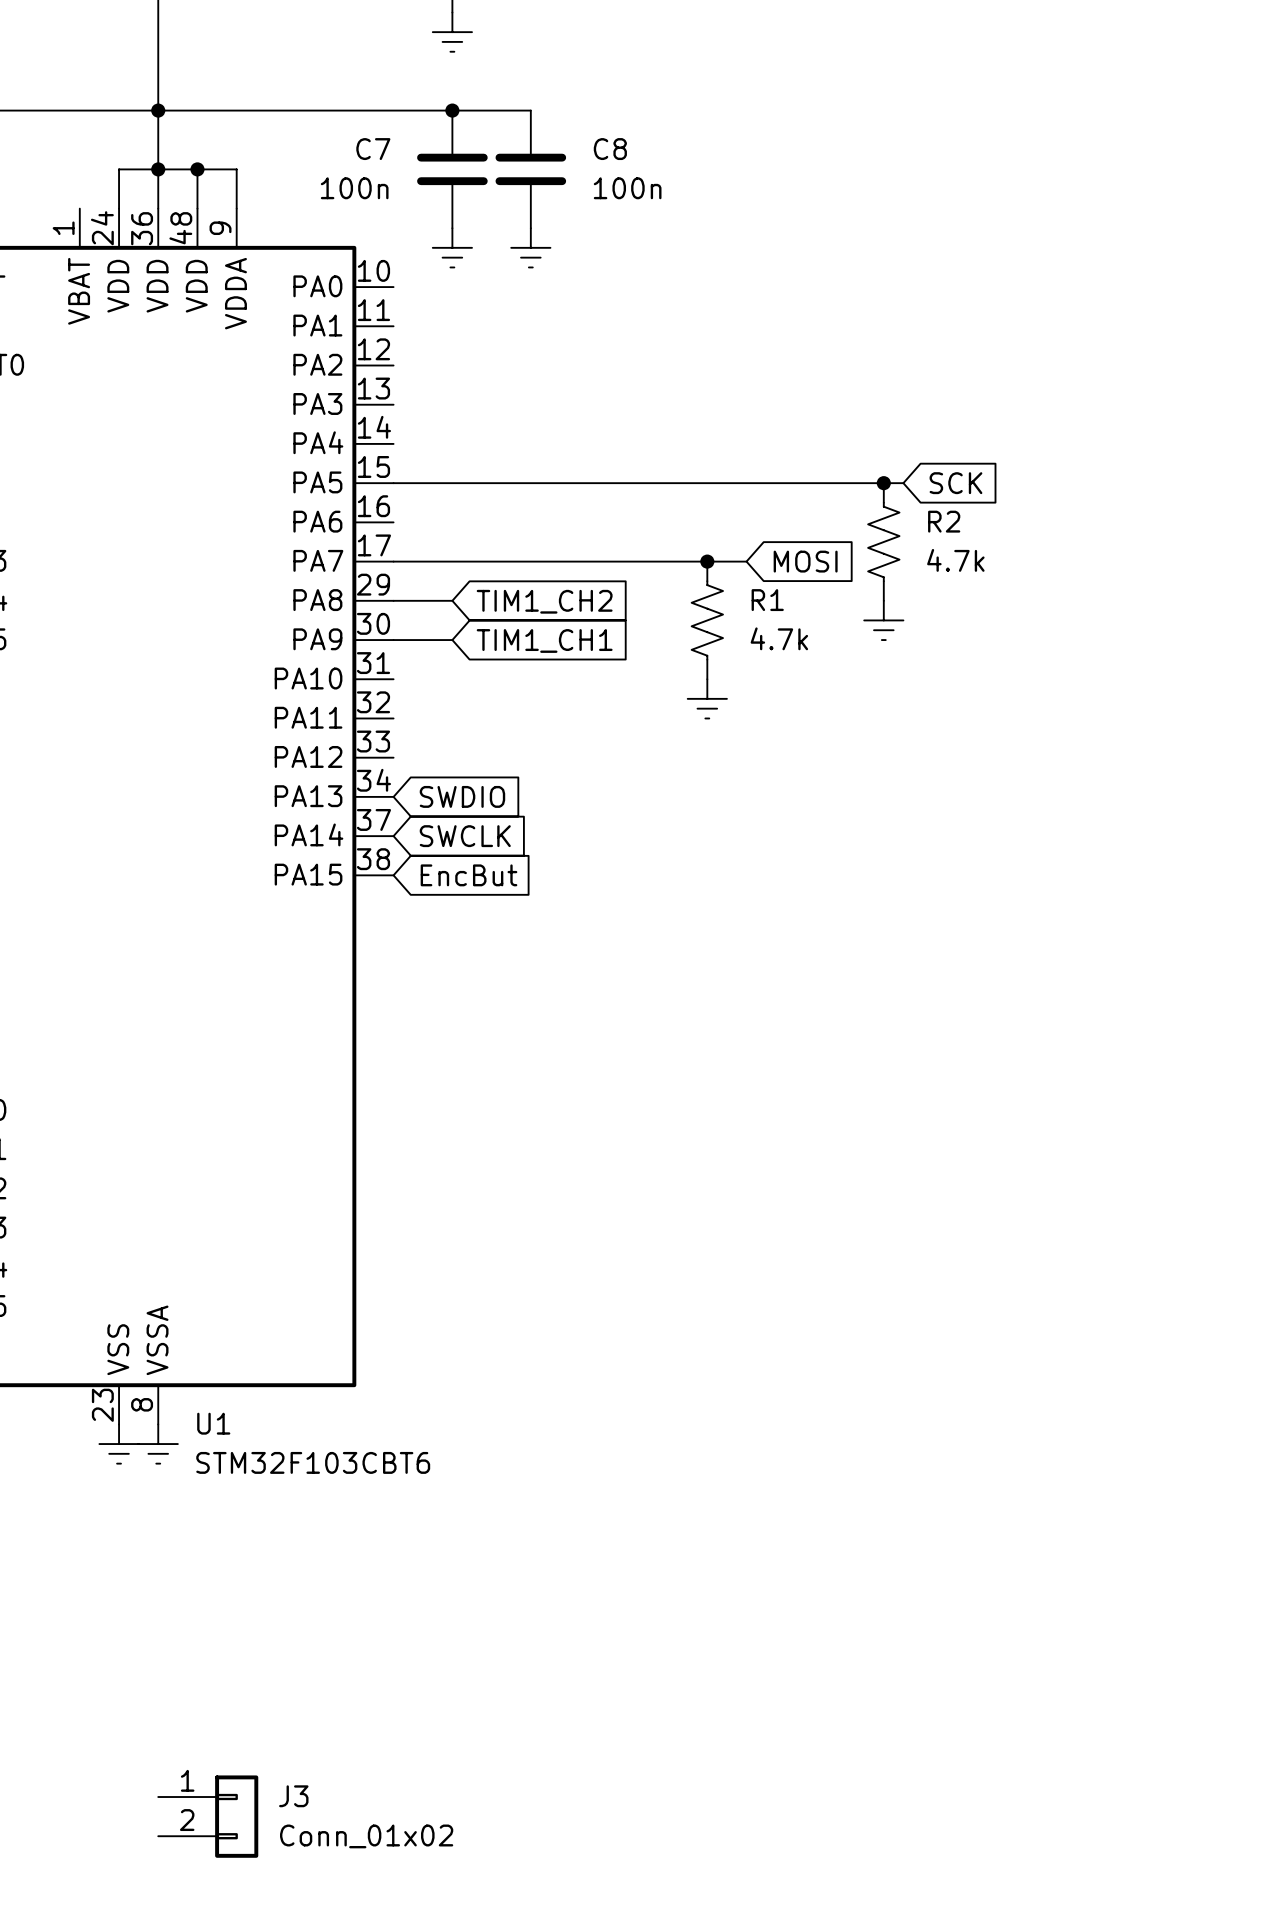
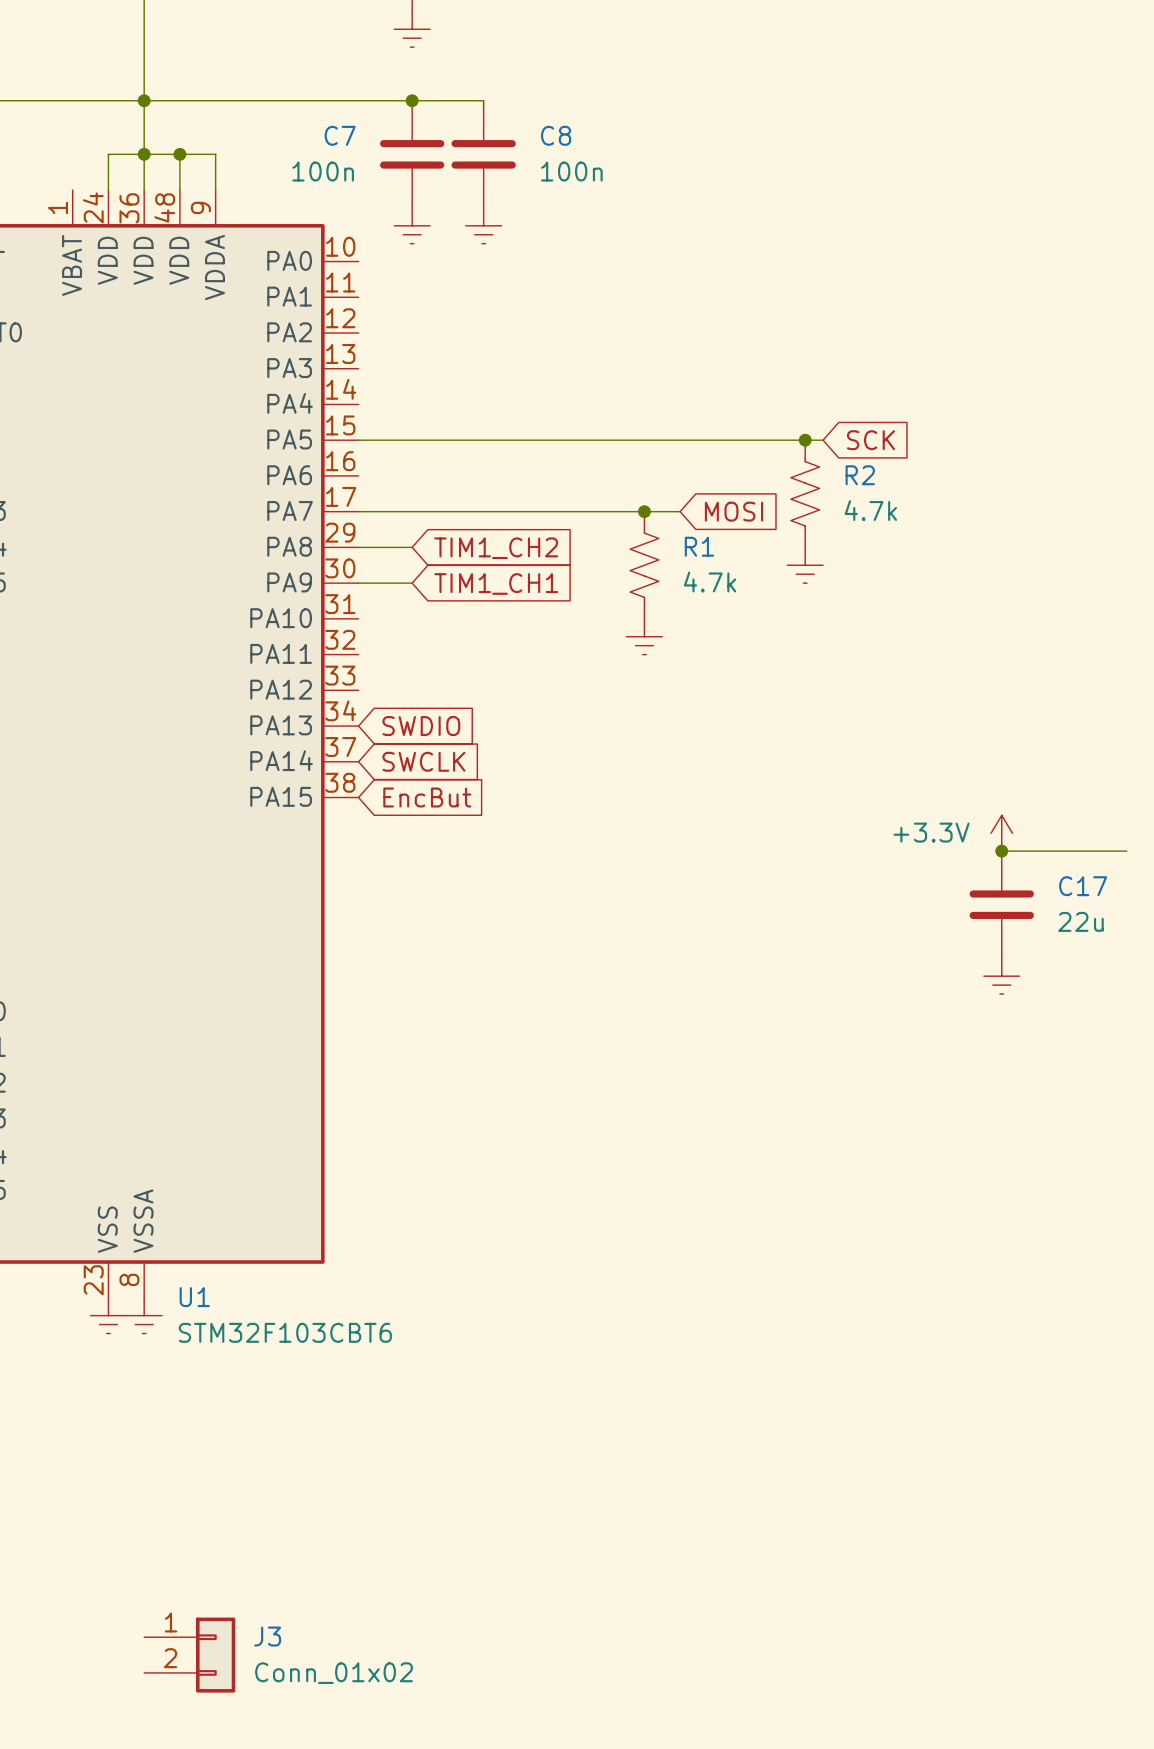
power symbol: none -> +3.3V (1001, 833)
wire: none -> (1001, 851) (1126, 851)
junction: none -> (1001, 851)
C17: none -> 22u (1001, 904)
power symbol: none -> (1001, 976)

